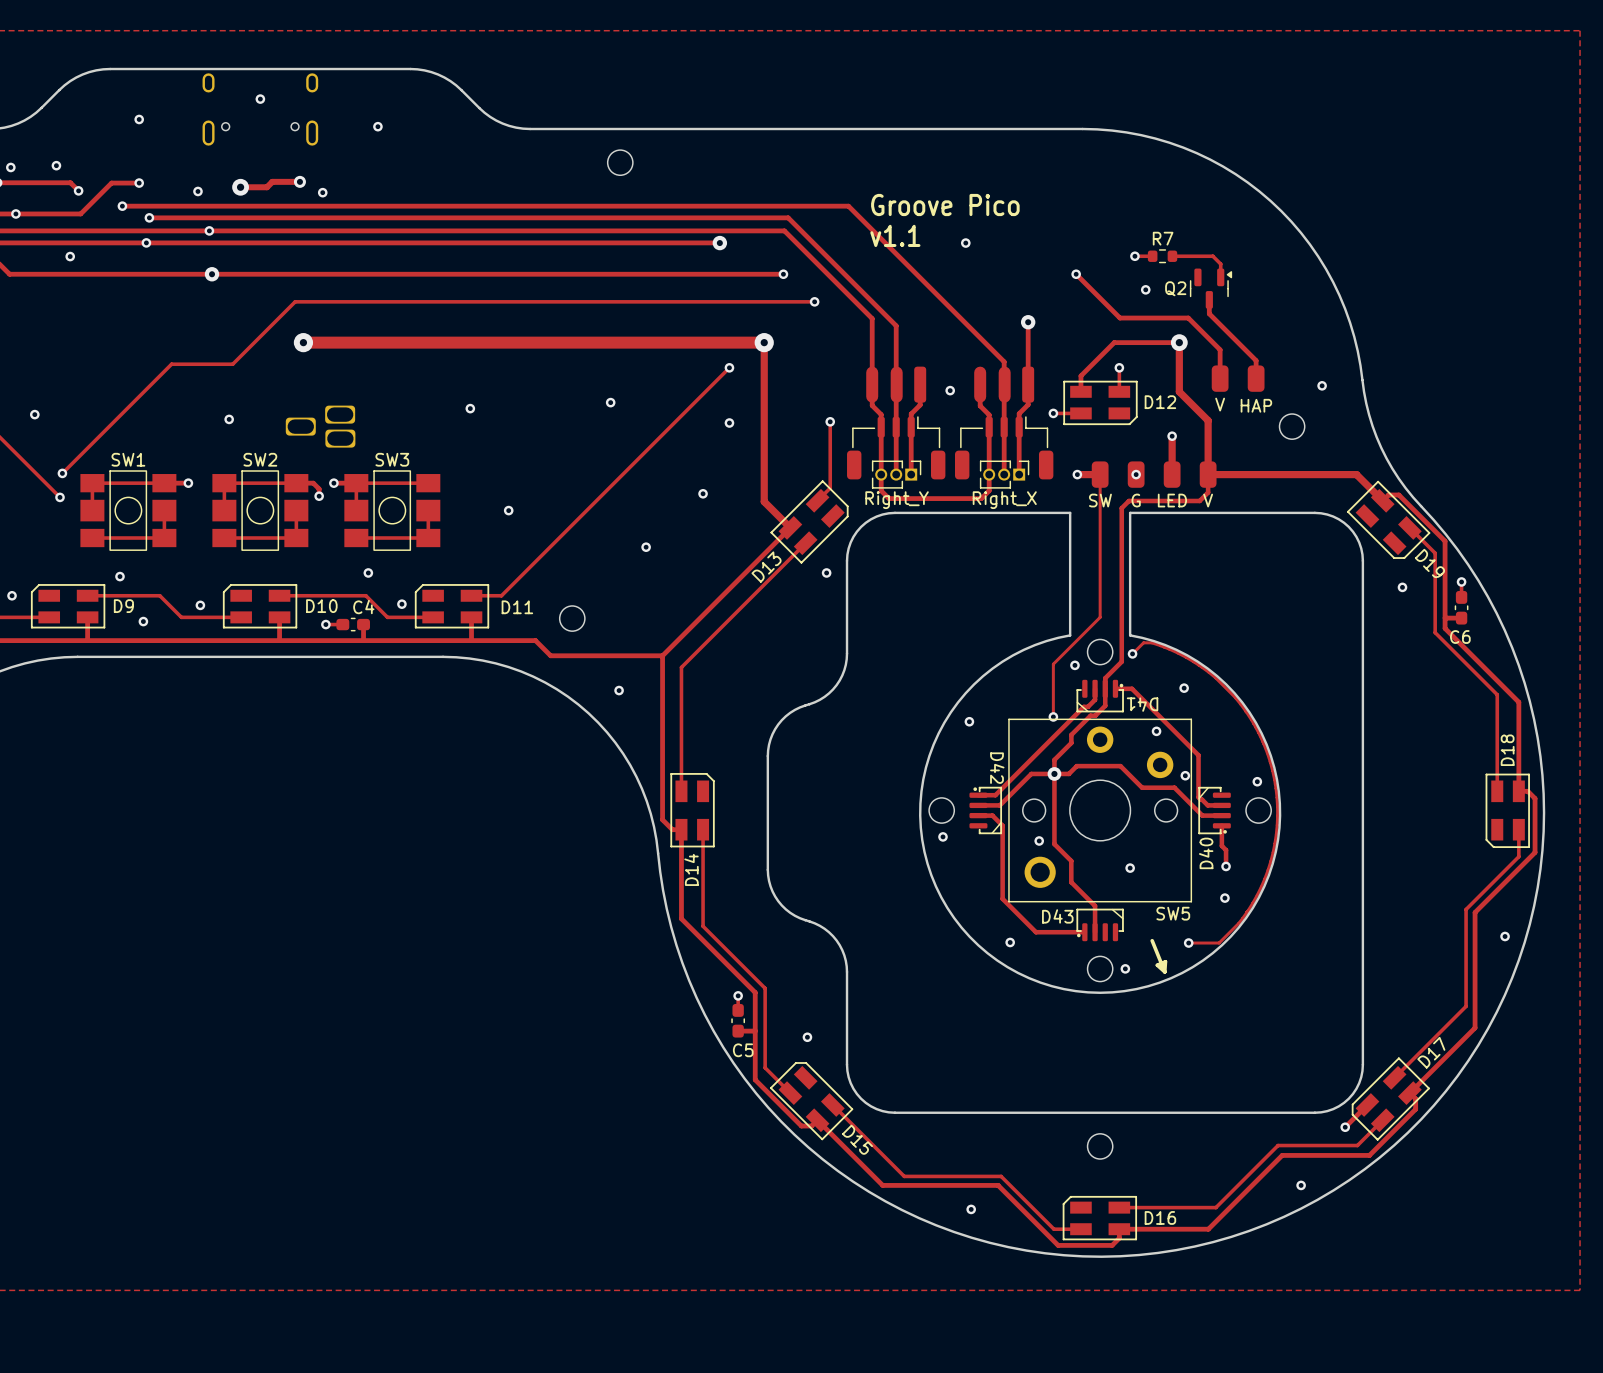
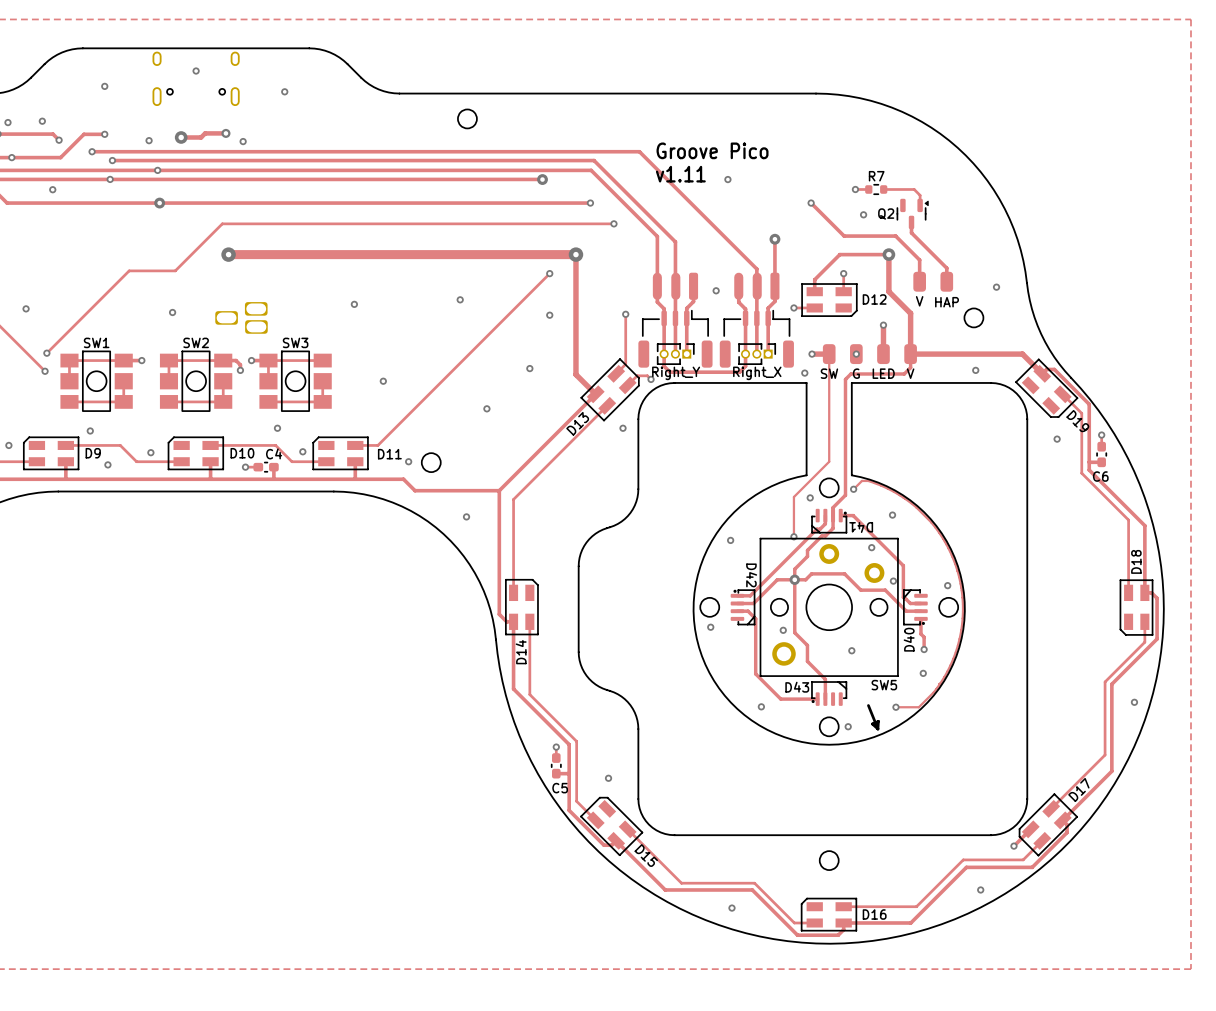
text: v1.1 (895, 235) -> v1.11 (680, 174)
part footprint: [847, 416, 946, 480] -> [638, 310, 713, 368]
part footprint: [954, 416, 1054, 480] -> [719, 310, 794, 368]
via: none -> (975, 370)
via: none -> (804, 373)
track: none -> (651, 379) (647, 375) (637, 375) (627, 385)
via: none -> (651, 379)
via: none -> (408, 461)

